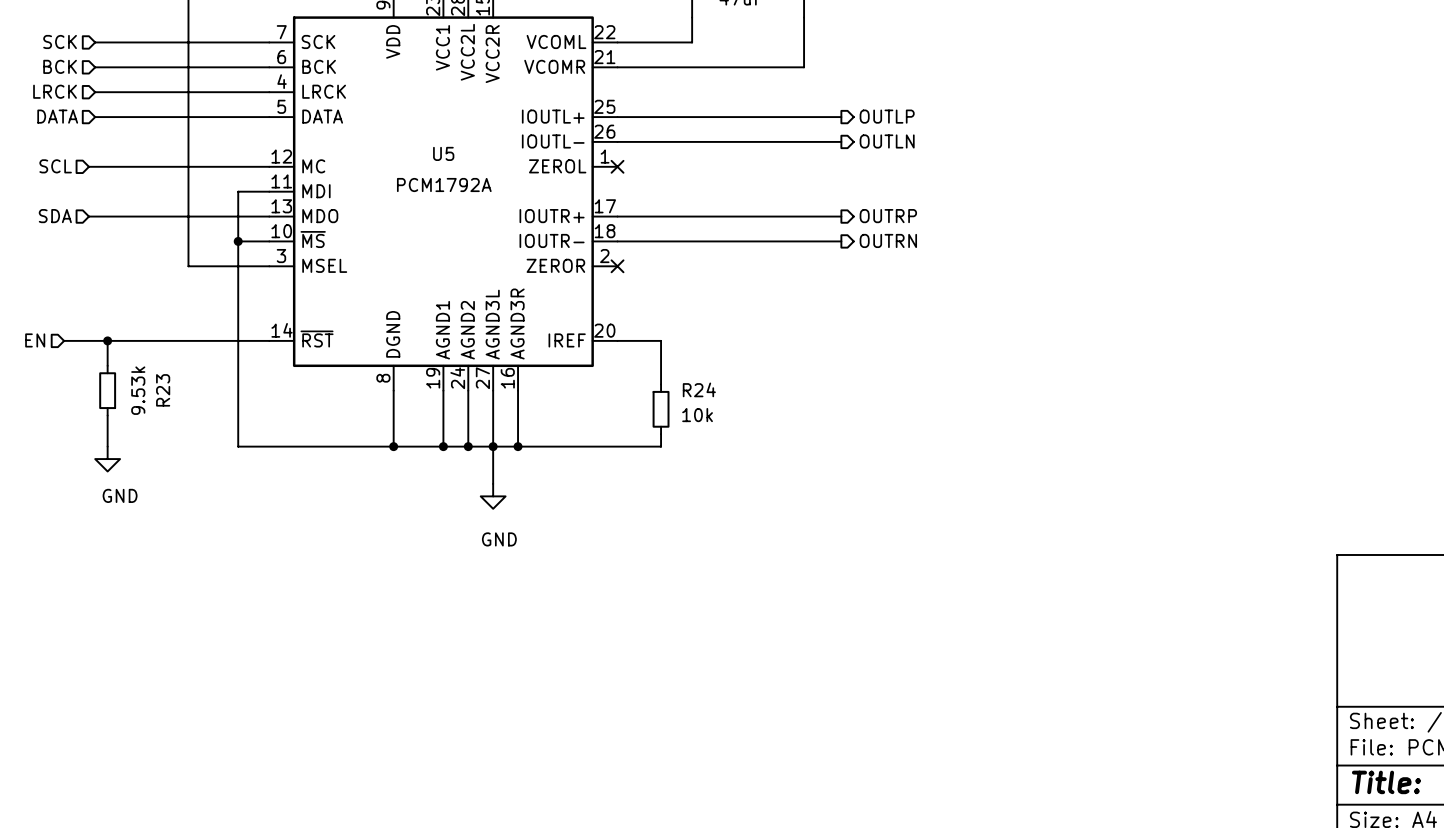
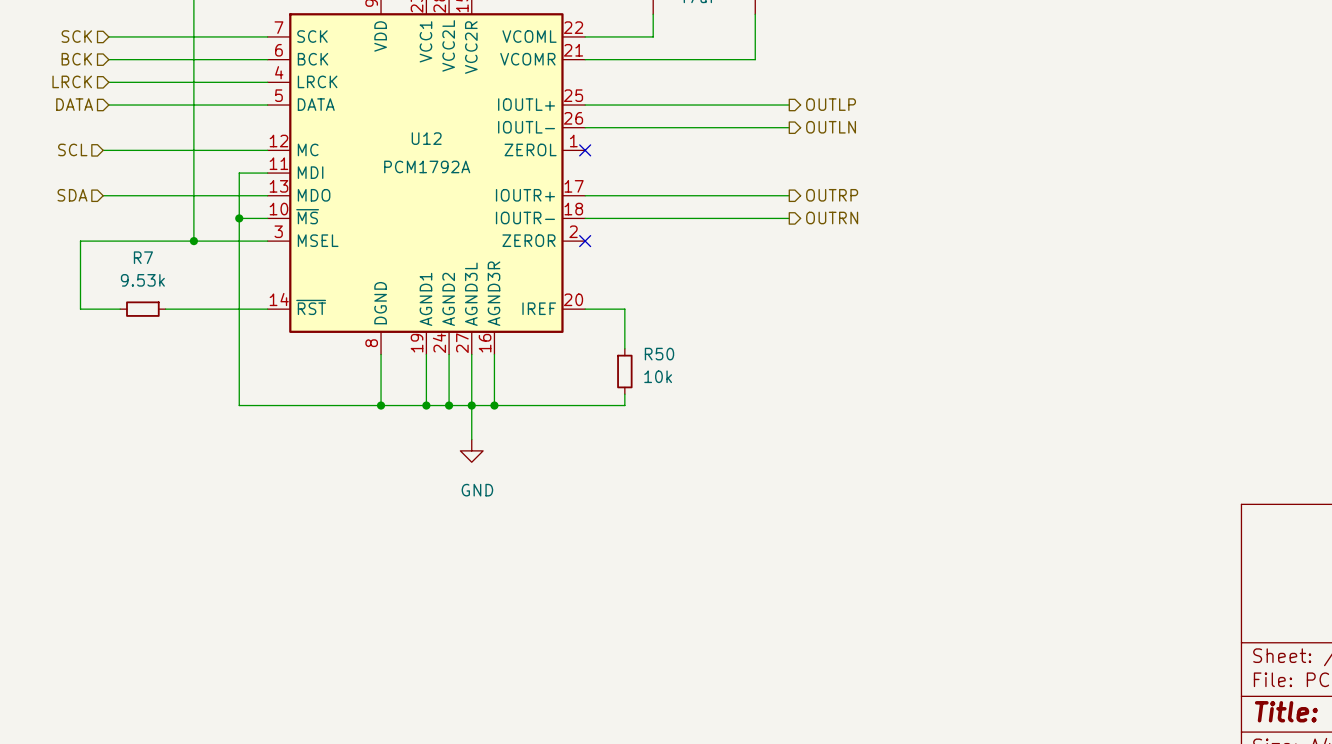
U5 name: U5 (443, 153) -> U12 (426, 138)
wire: none -> (193, 241) (80, 241) (80, 309)
junction: none -> (193, 241)
hierarchical label: EN (35, 340) -> none
junction: (107, 340) -> none
R7: none -> 9.53k (142, 309)
wire: (157, 340) (107, 340) (107, 365) -> none
R24 name: R24 (699, 389) -> R50 (659, 354)
R23: 9.53k (107, 390) -> none
wire: (107, 415) (107, 446) -> none
power symbol: GND (107, 459) -> none

